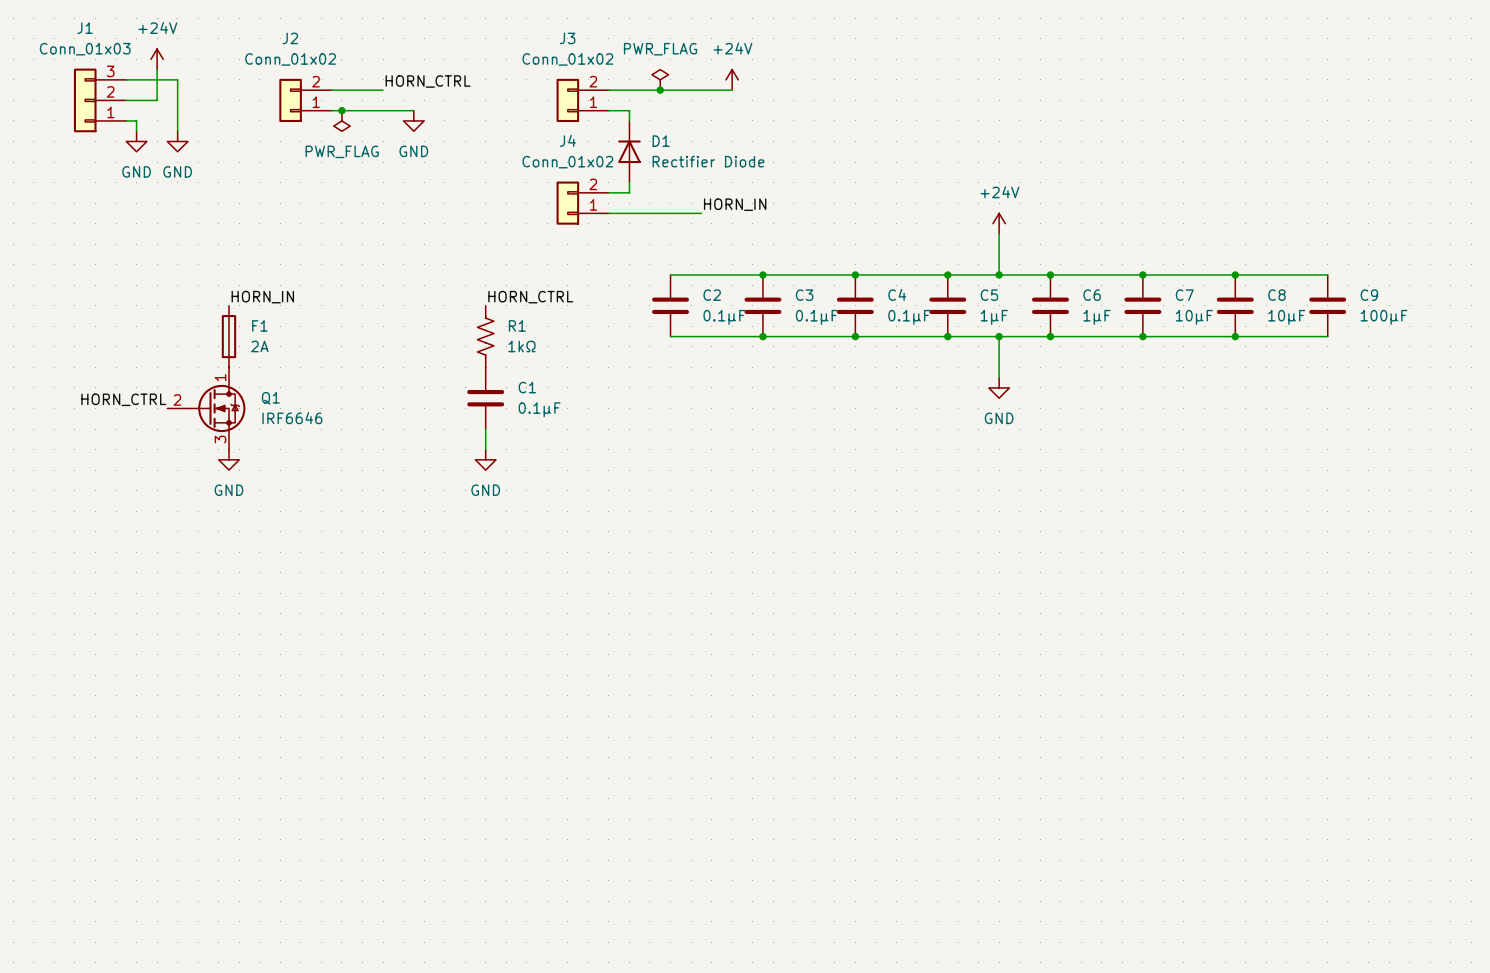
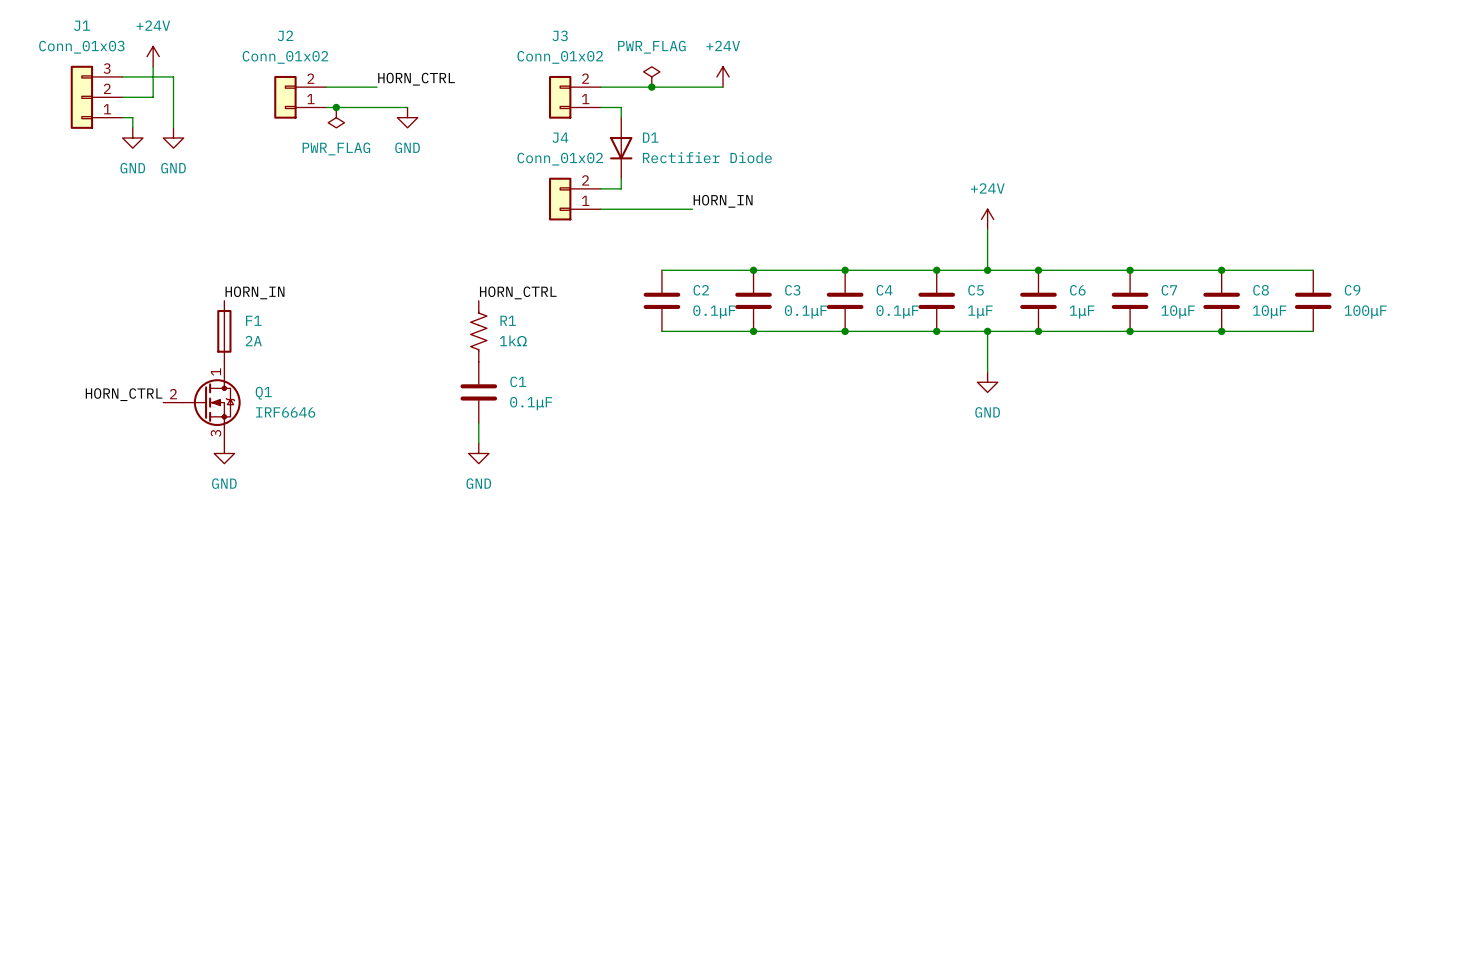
D1 rotation: 0° (629, 151) -> 180° (621, 148)

